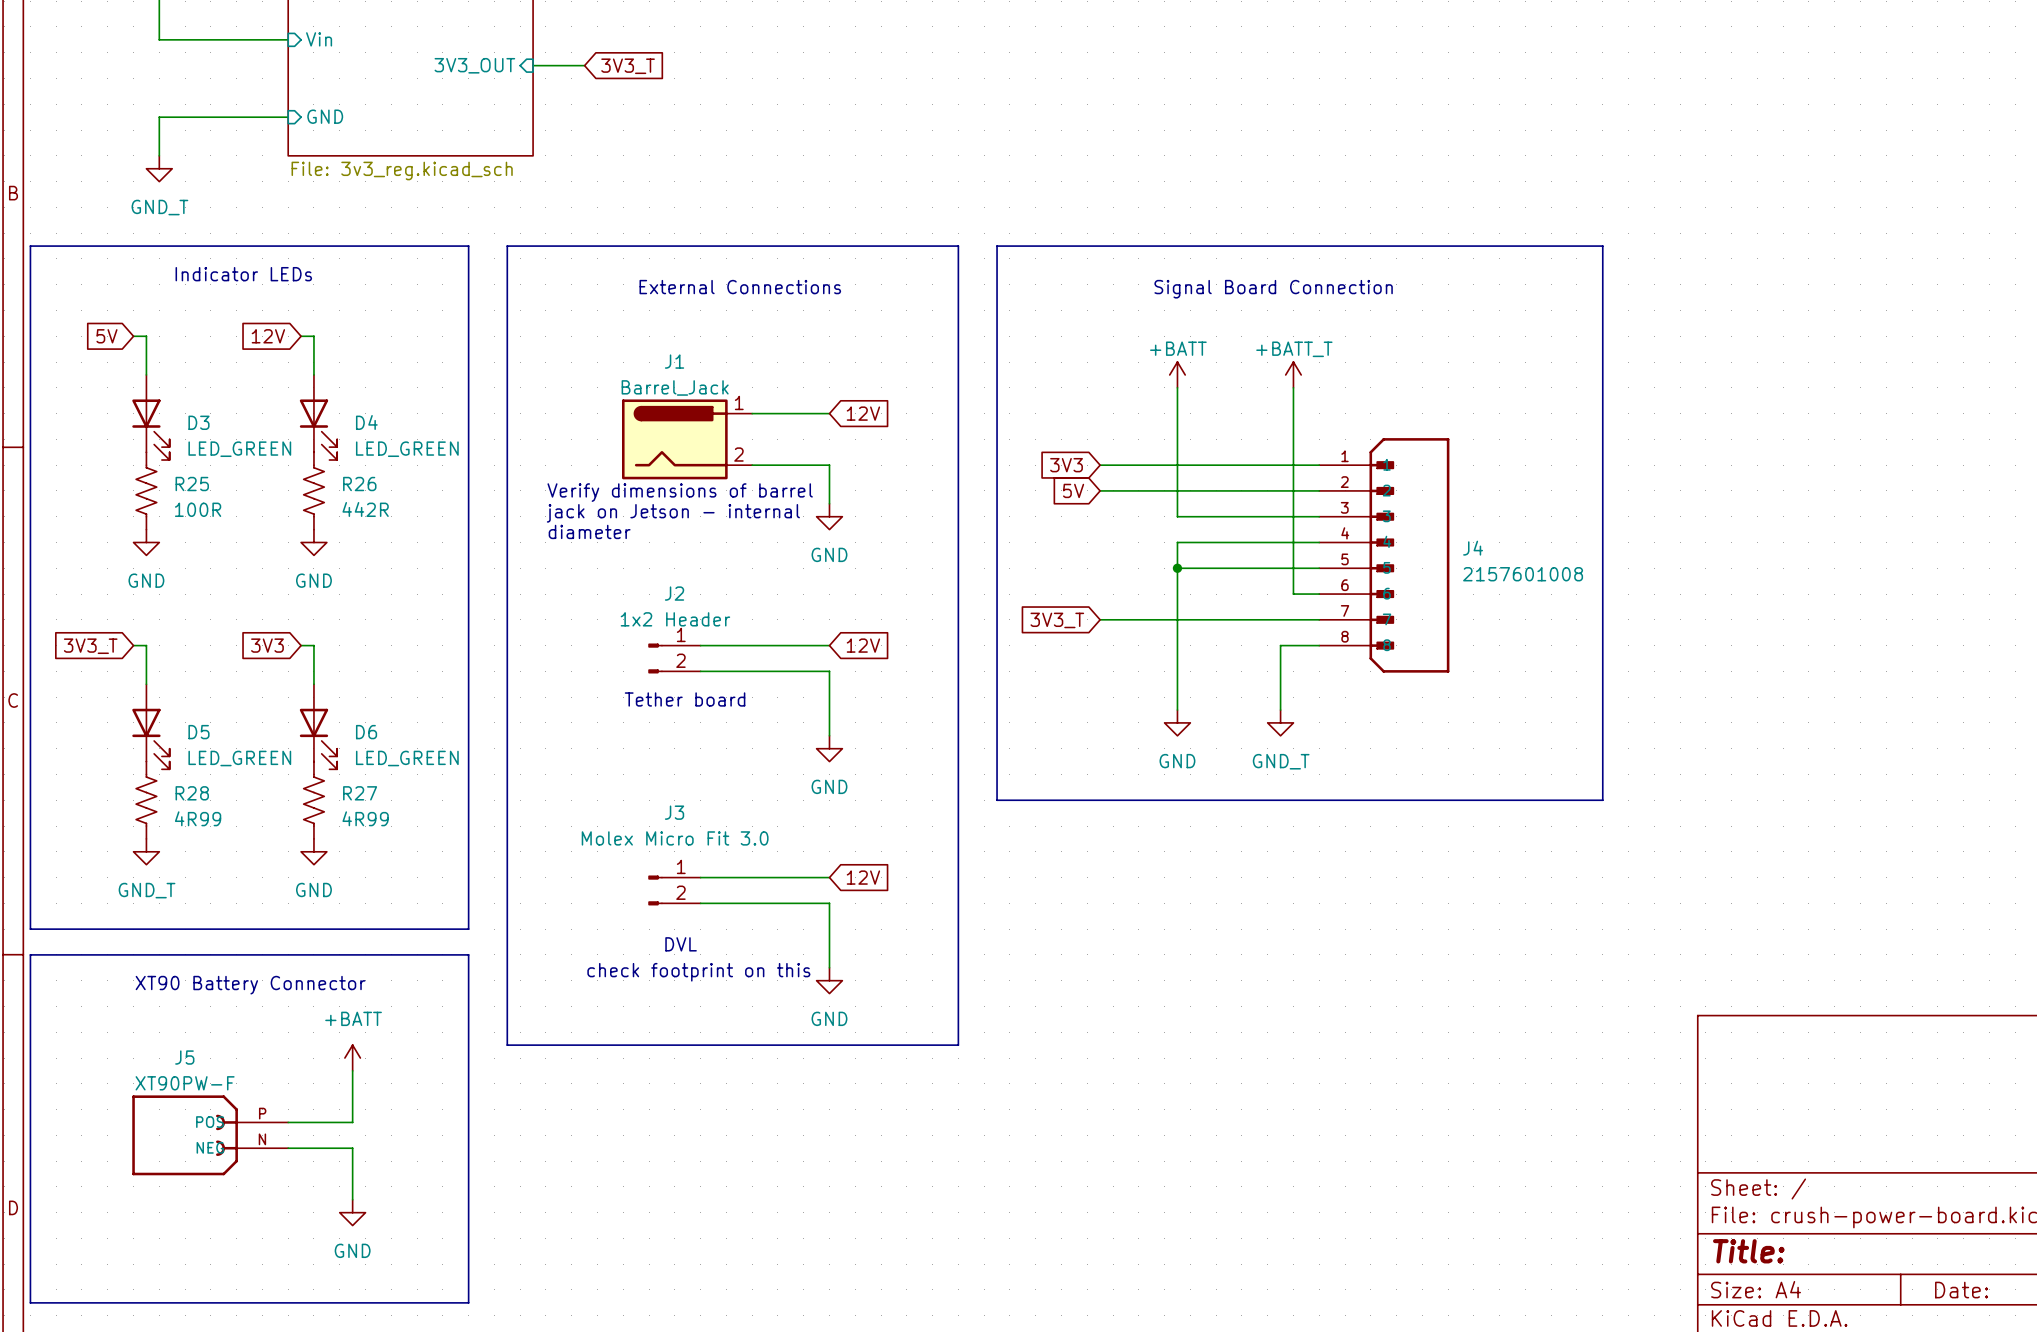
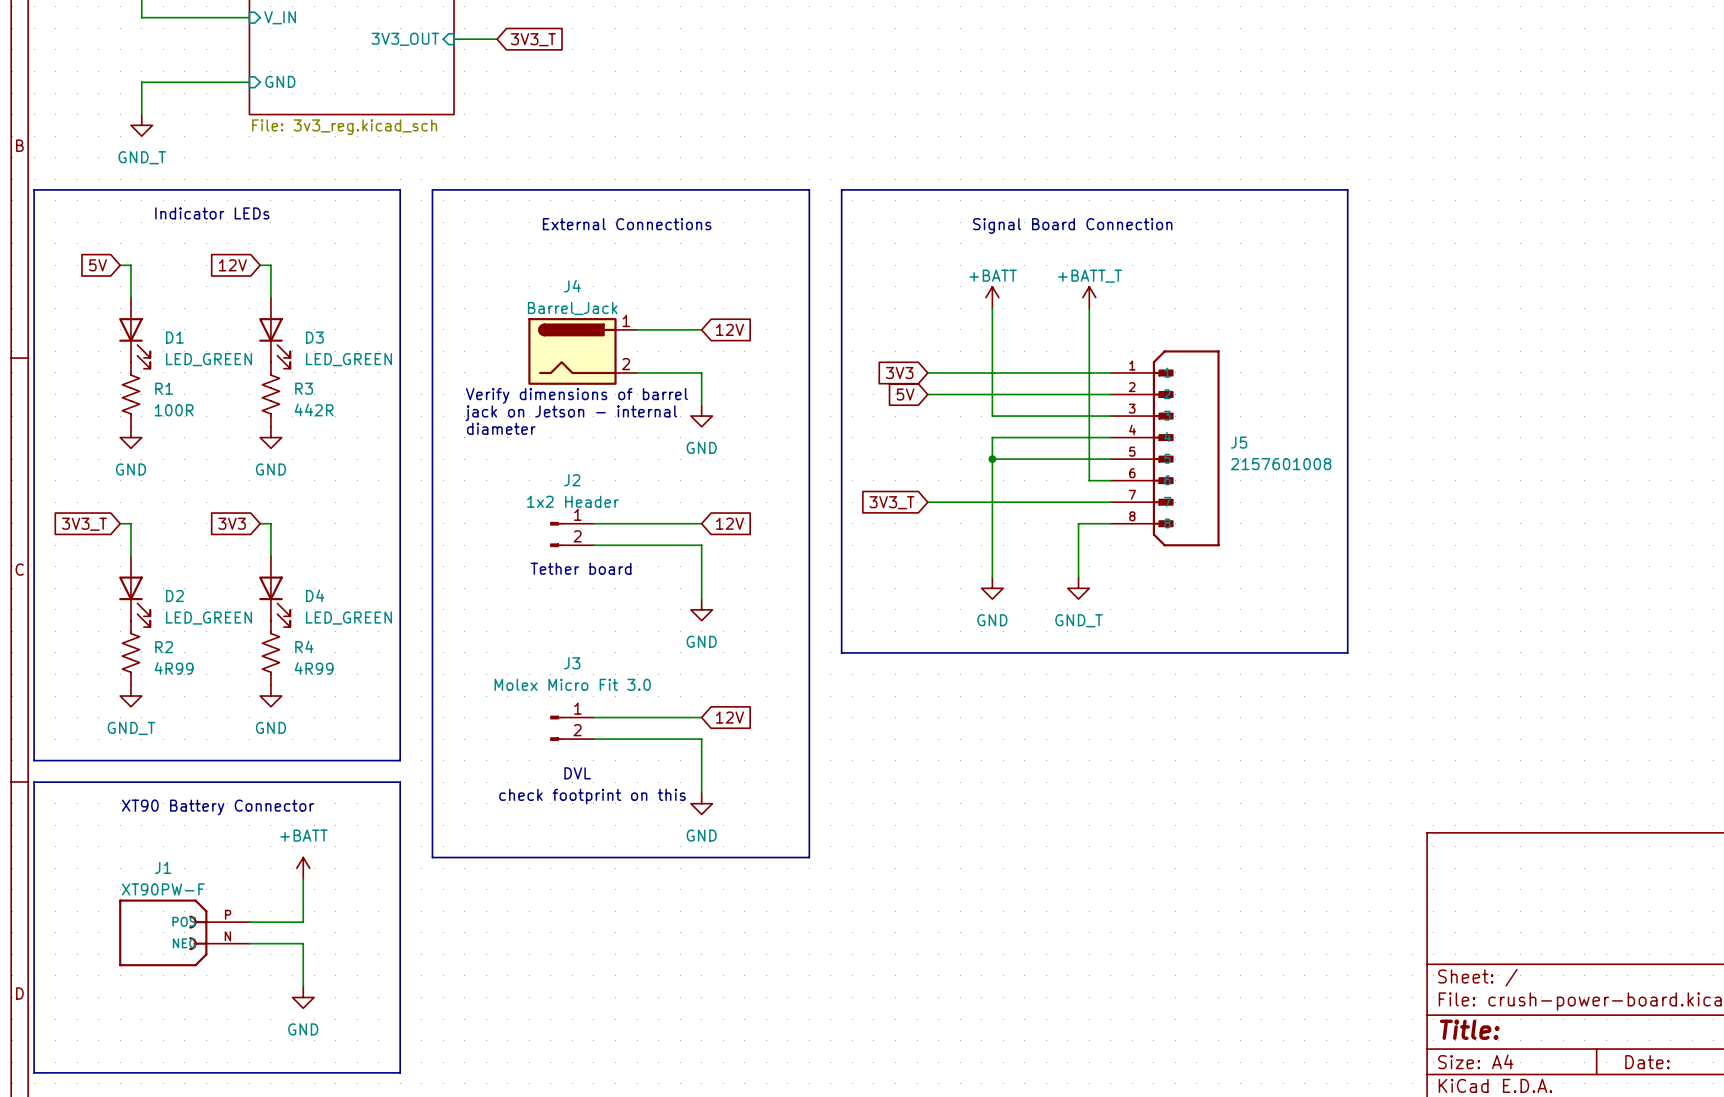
sheet pin: Vin (319, 39) -> V_IN (280, 17)
J1 name: J1 (674, 361) -> J4 (572, 286)
D3 name: D3 (198, 422) -> D1 (174, 337)
D4 name: D4 (366, 422) -> D3 (314, 337)
R25 name: R25 (192, 484) -> R1 (164, 388)
R26 name: R26 (359, 484) -> R3 (304, 388)
J4 name: J4 (1473, 548) -> J5 (1239, 442)
D5 name: D5 (198, 732) -> D2 (174, 596)
D6 name: D6 (366, 732) -> D4 (315, 595)
R28 name: R28 (192, 793) -> R2 (164, 647)
R27 name: R27 (360, 793) -> R4 (304, 646)
J5 name: J5 (184, 1057) -> J1 (163, 867)

